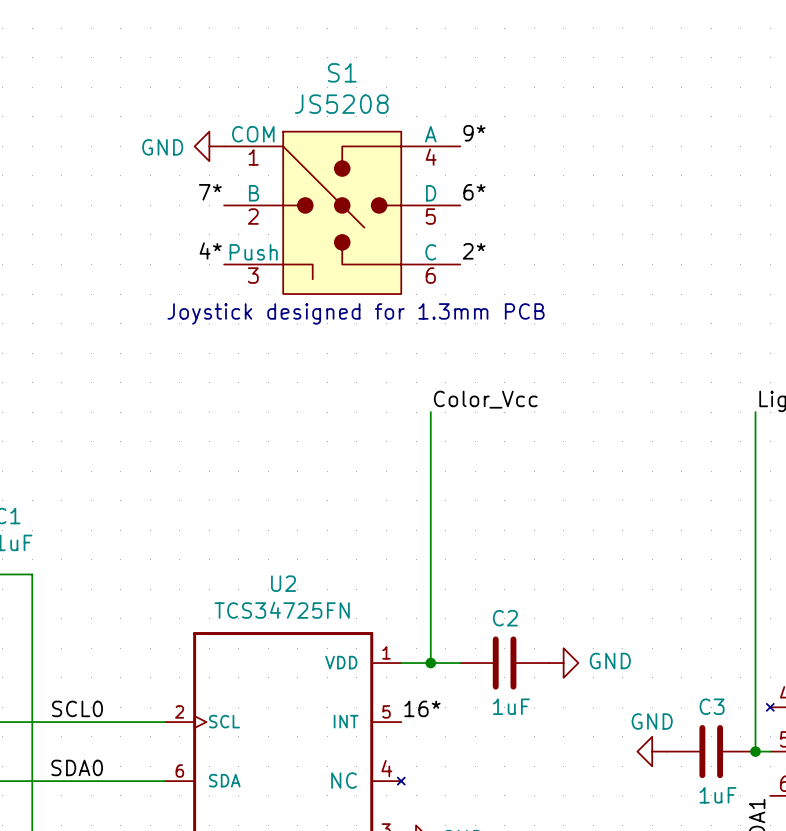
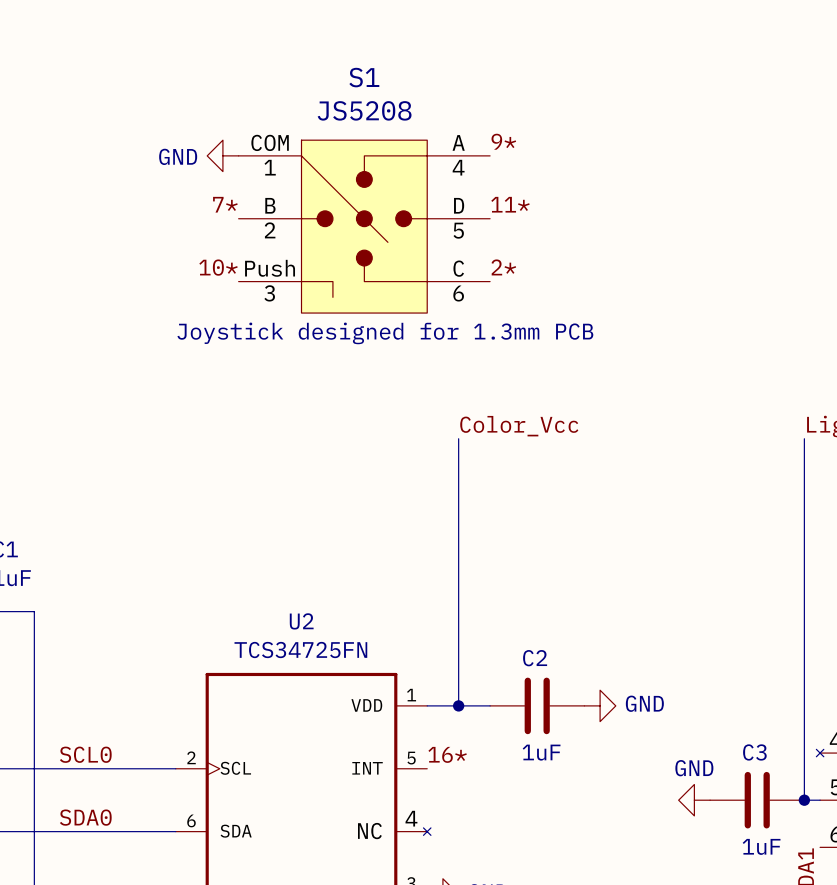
label: 6* (474, 192) -> 11* (510, 204)
label: 4* (210, 250) -> 10* (218, 267)

